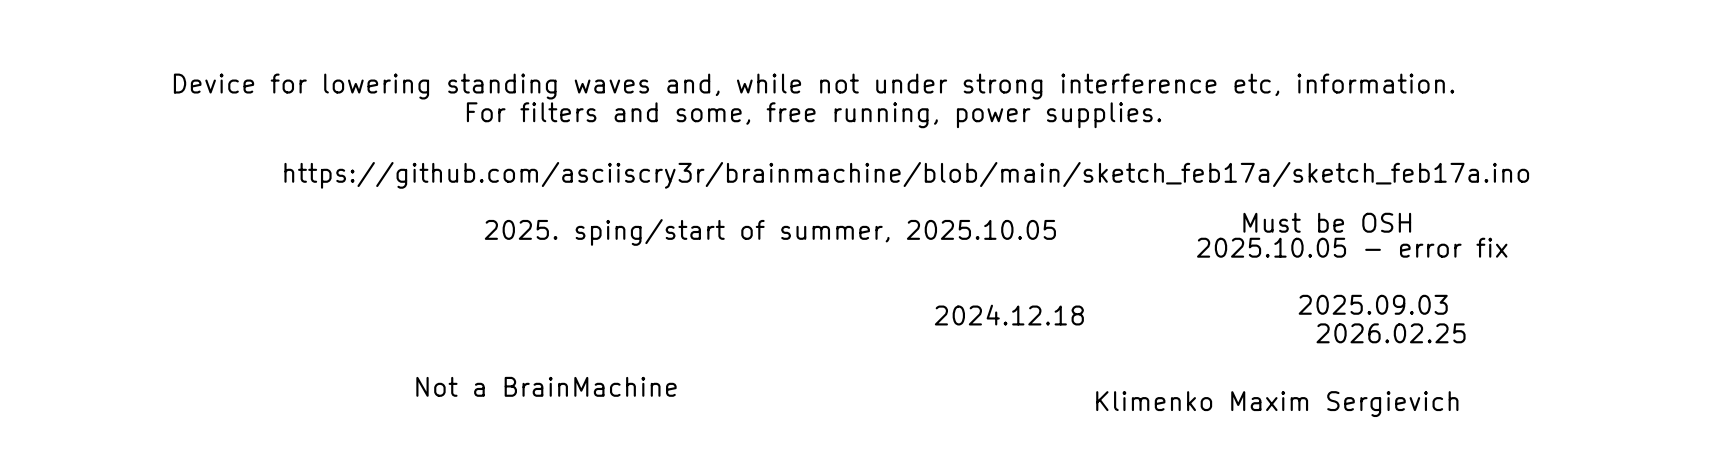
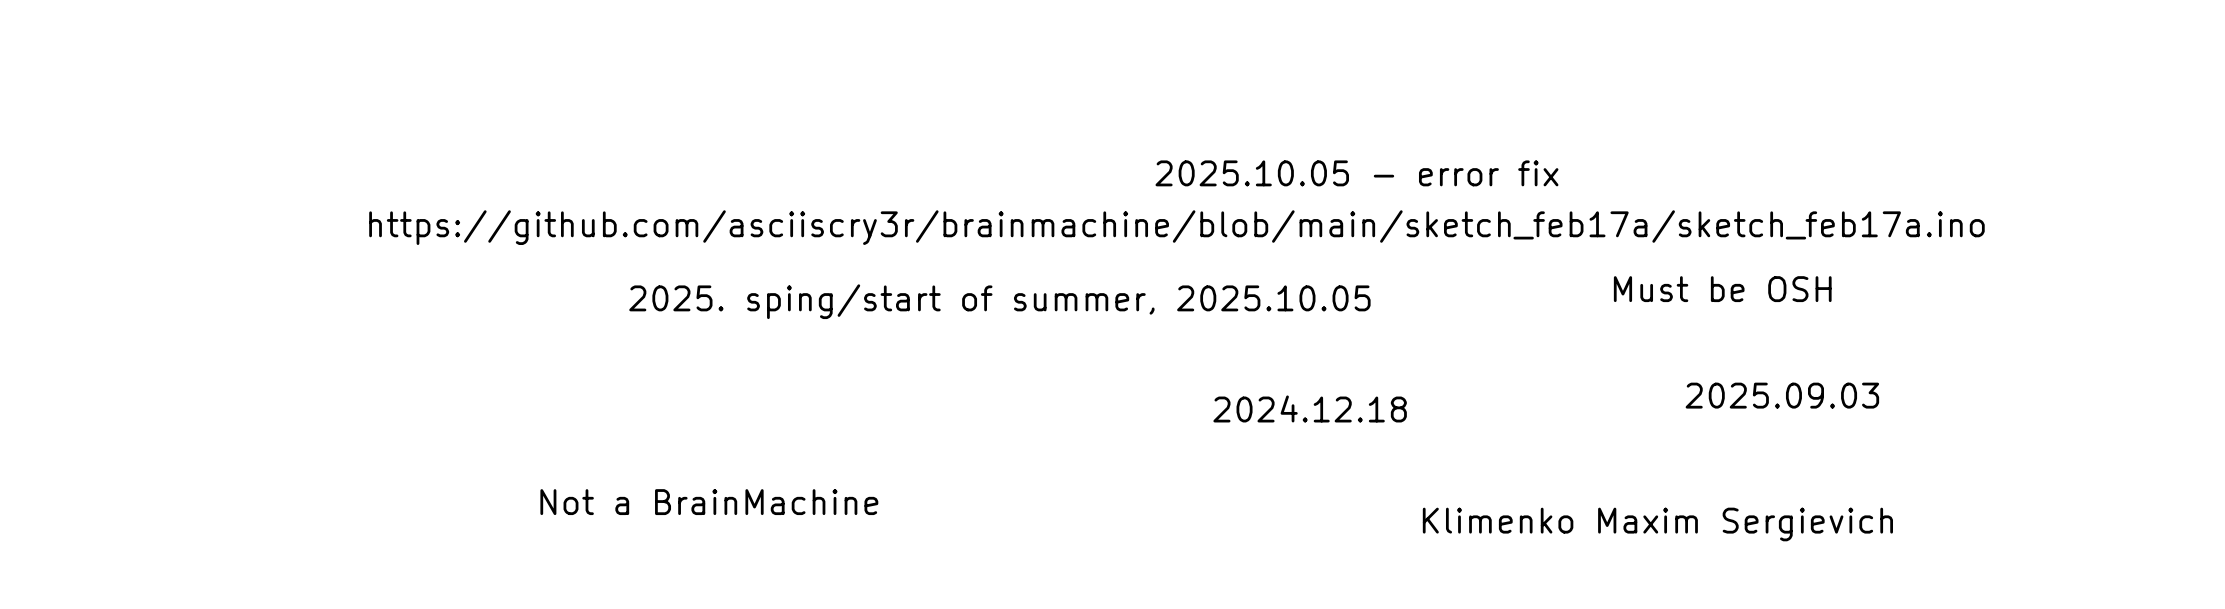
text: Device for lowering standing waves and, while not under strong interference etc, information. (814, 86) -> none
text: For filters and some, free running, power supplies. (814, 115) -> none
text position: 2025.10.05 - error fix (1352, 247) -> 2025.10.05 - error fix (1356, 173)
text: 2026.02.25 (1391, 333) -> none

